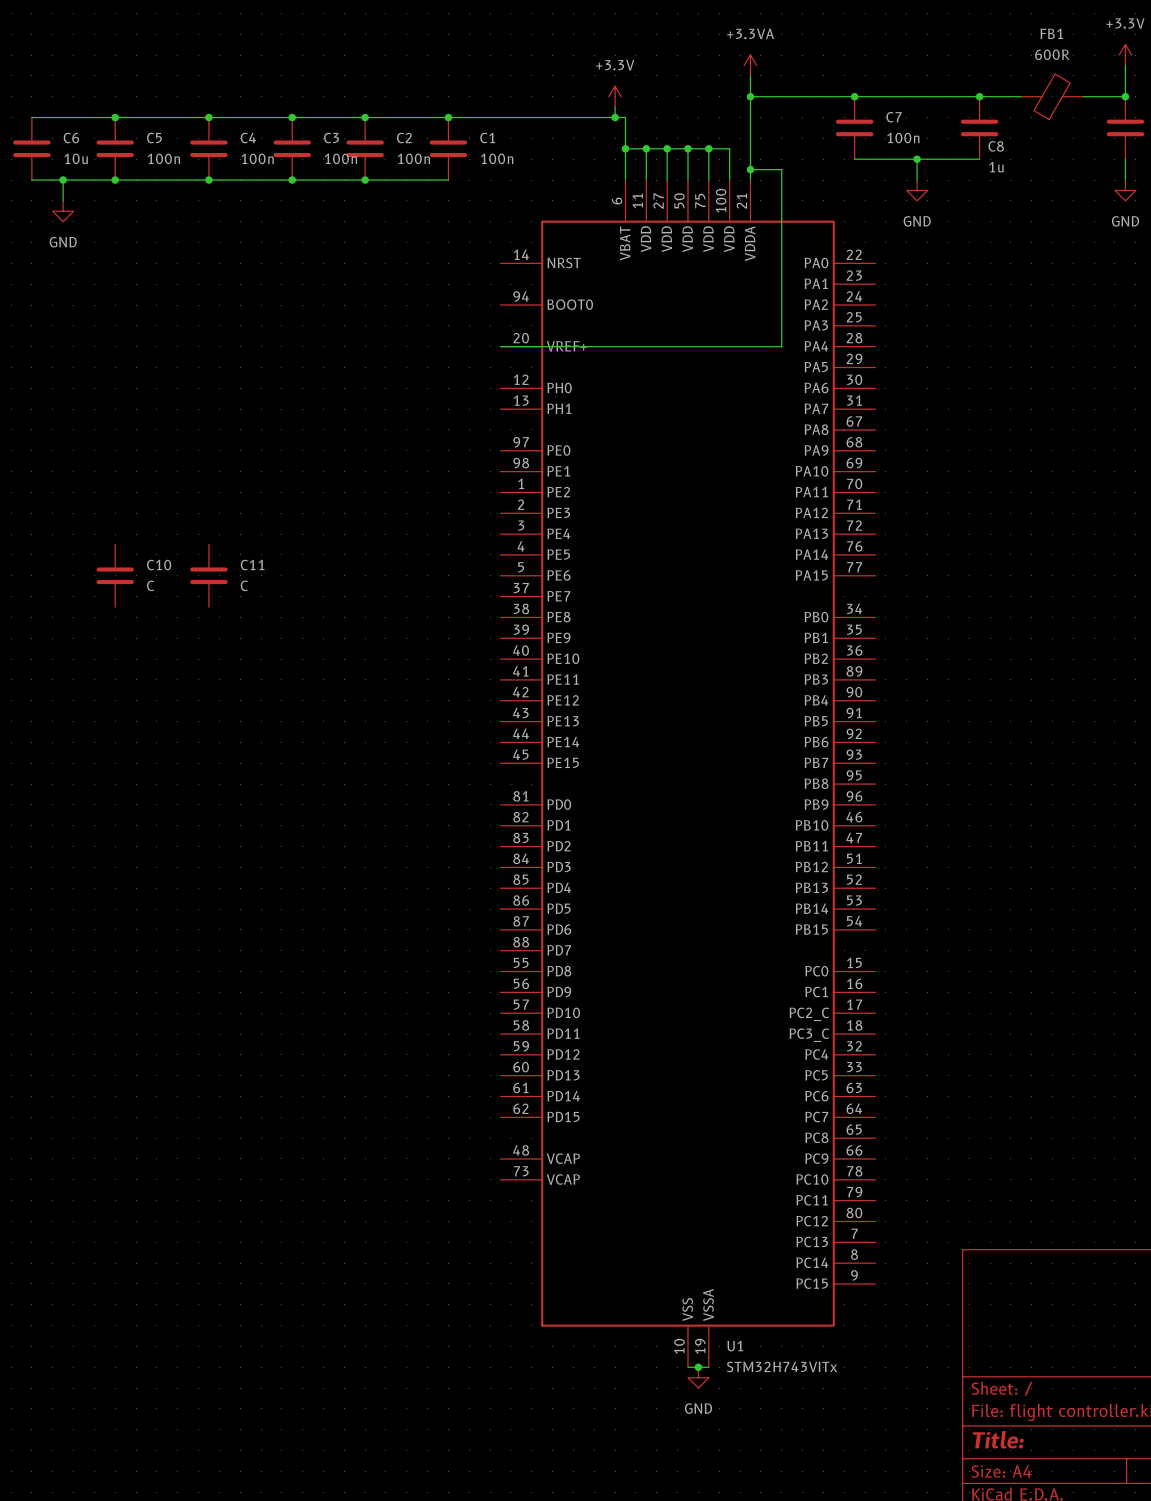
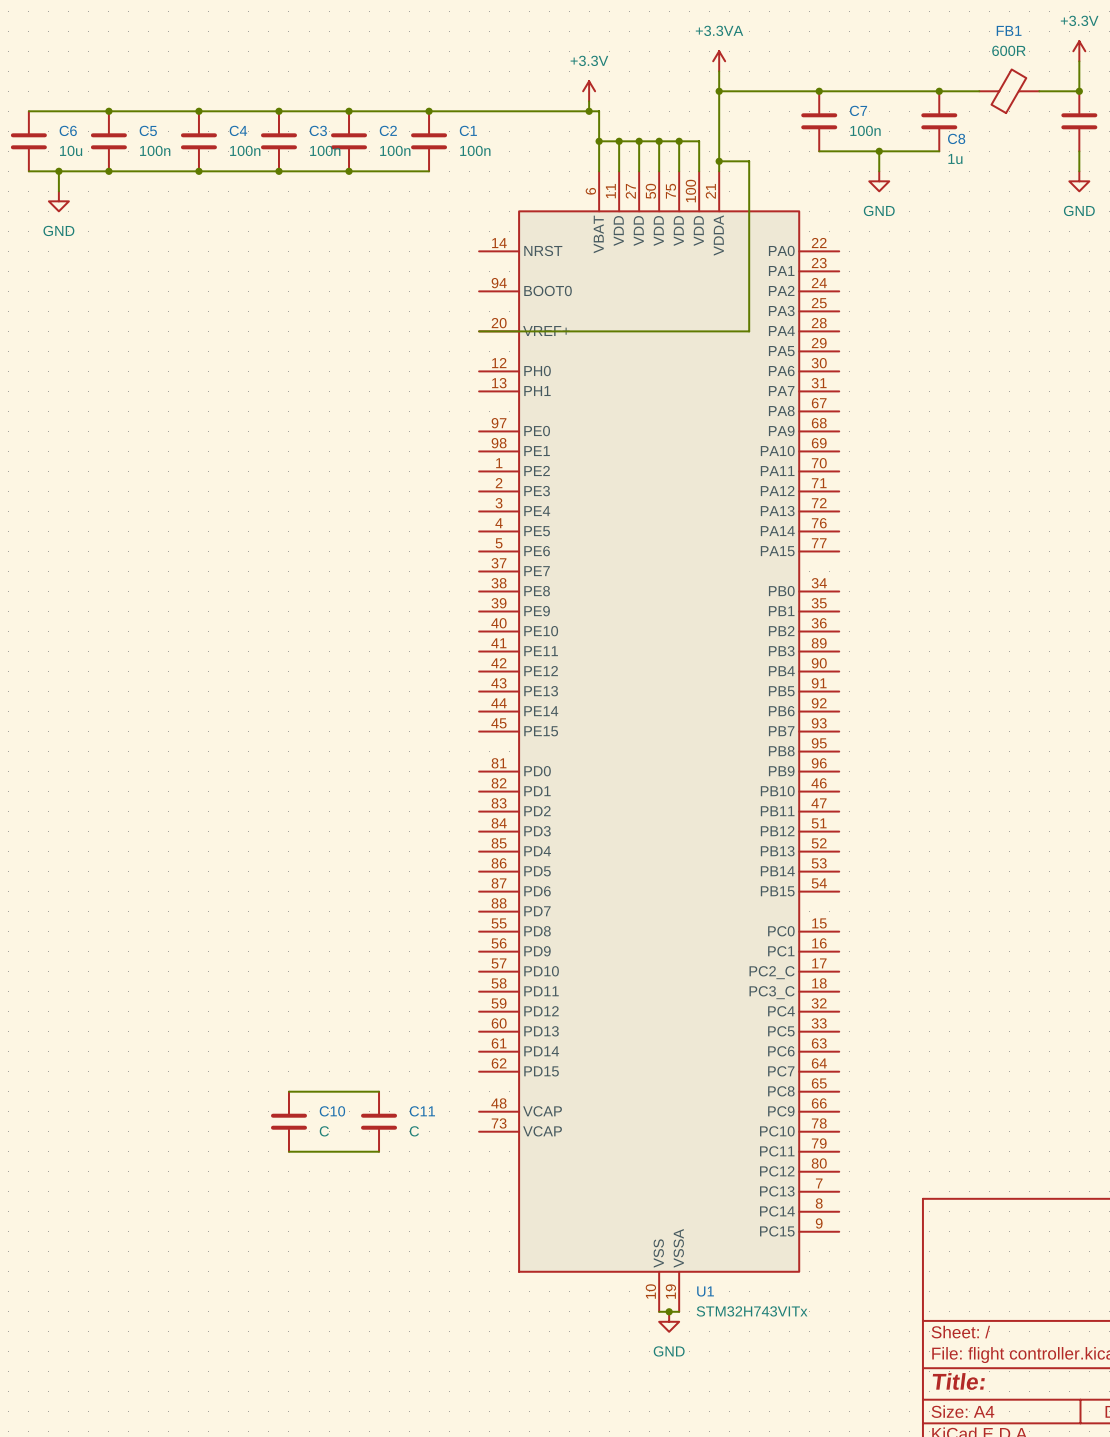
C10 position: (115, 575) -> (288, 1121)
C11 position: (208, 575) -> (379, 1121)
wire: none -> (288, 1091) (379, 1091)
wire: none -> (288, 1151) (379, 1151)

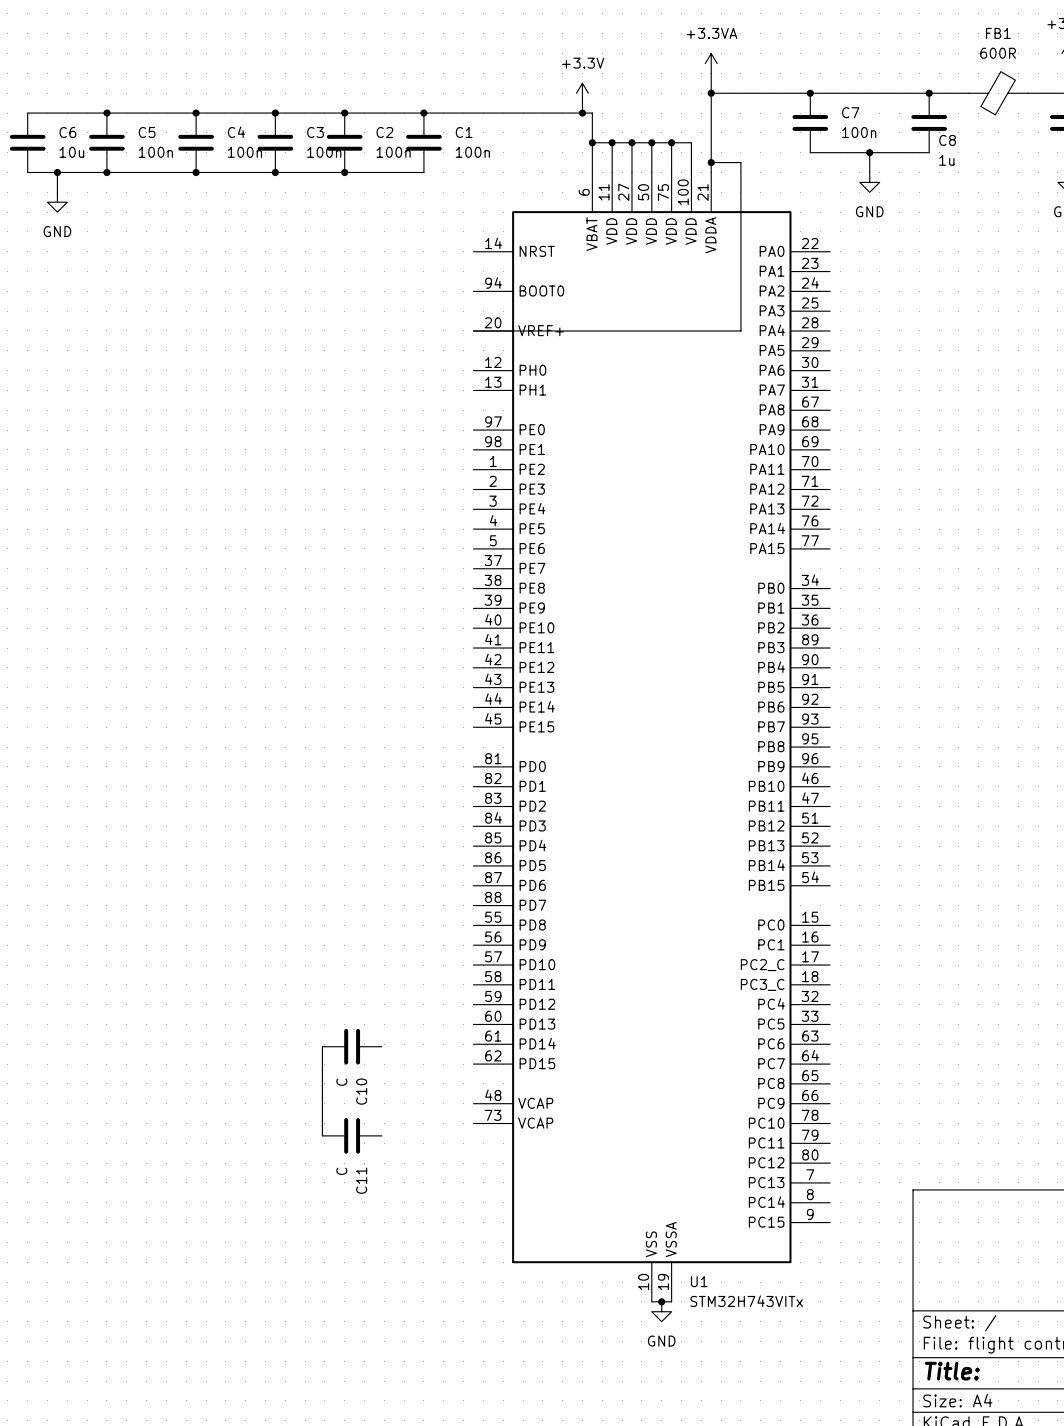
wire: none -> (322, 1046) (322, 1135)
wire: (288, 1091) (379, 1091) -> none
C10 rotation: 0° (288, 1121) -> 90° clockwise (352, 1046)
C10 position: (288, 1121) -> (352, 1046)
C11 rotation: 0° (379, 1121) -> 90° clockwise (352, 1135)
wire: (288, 1151) (379, 1151) -> none

